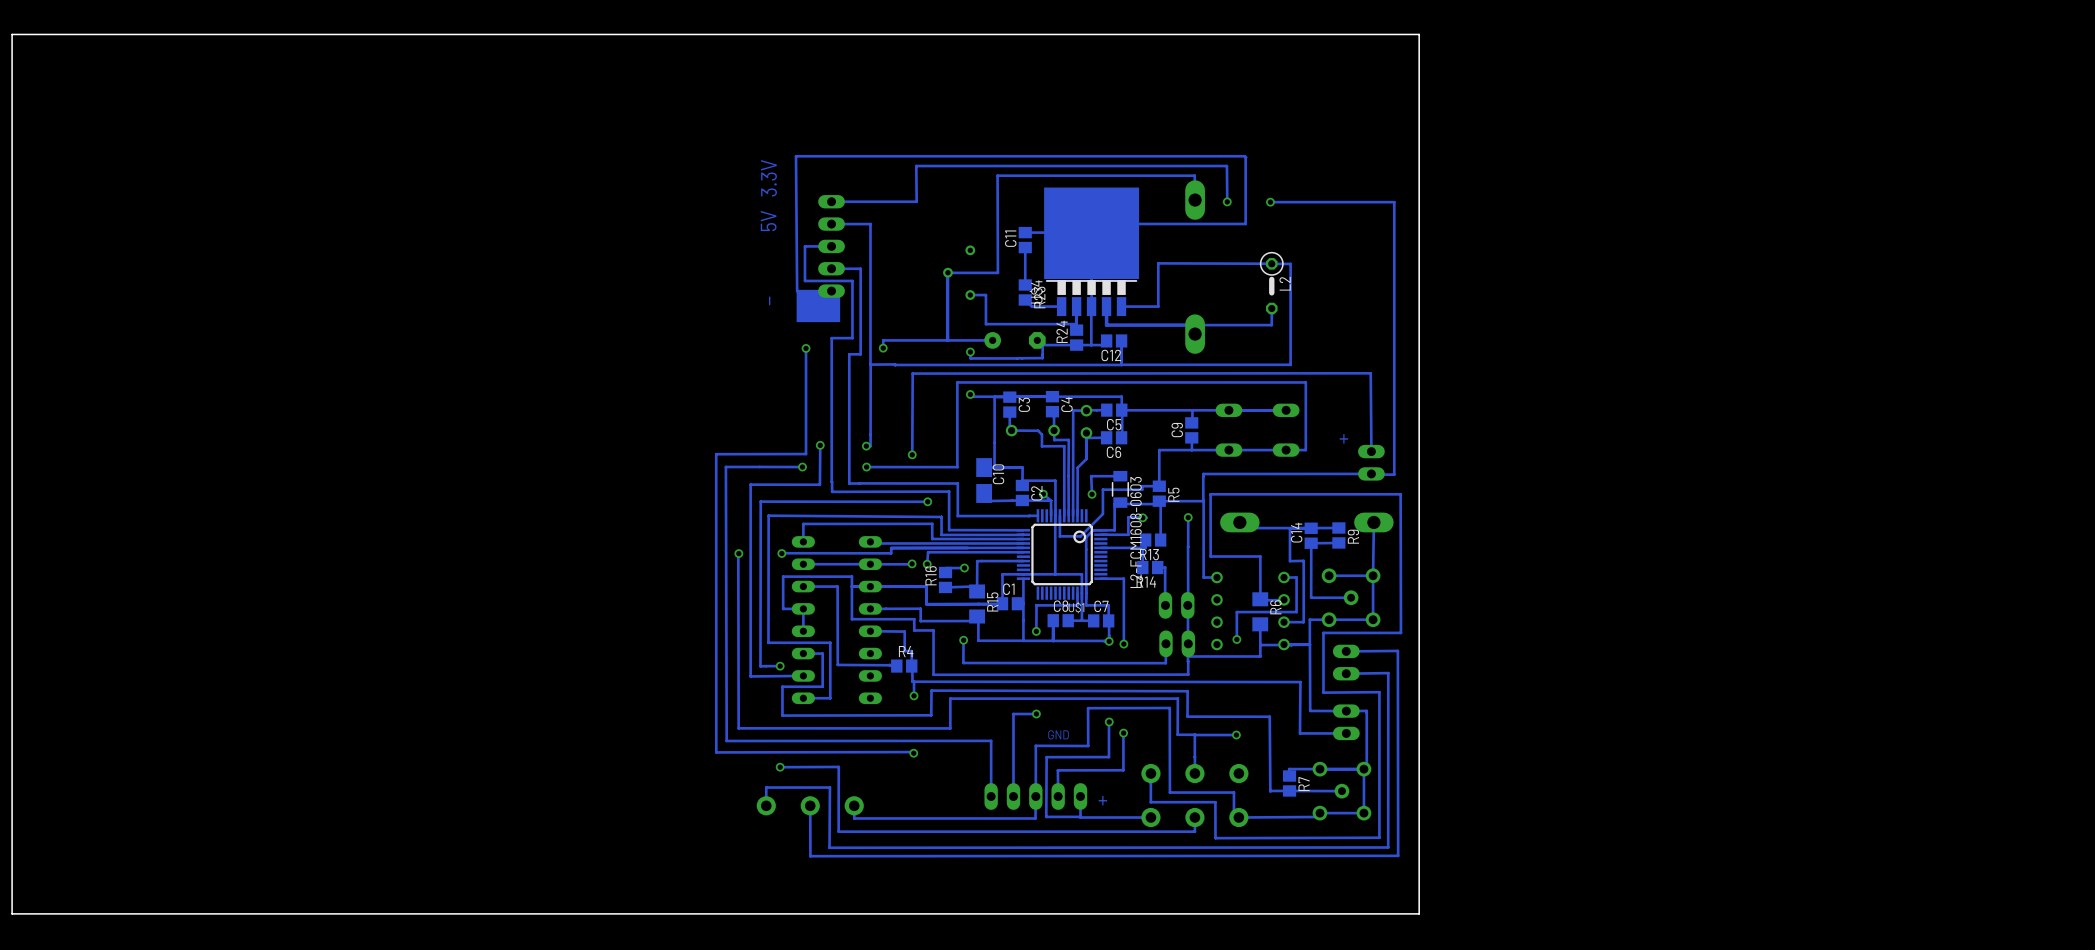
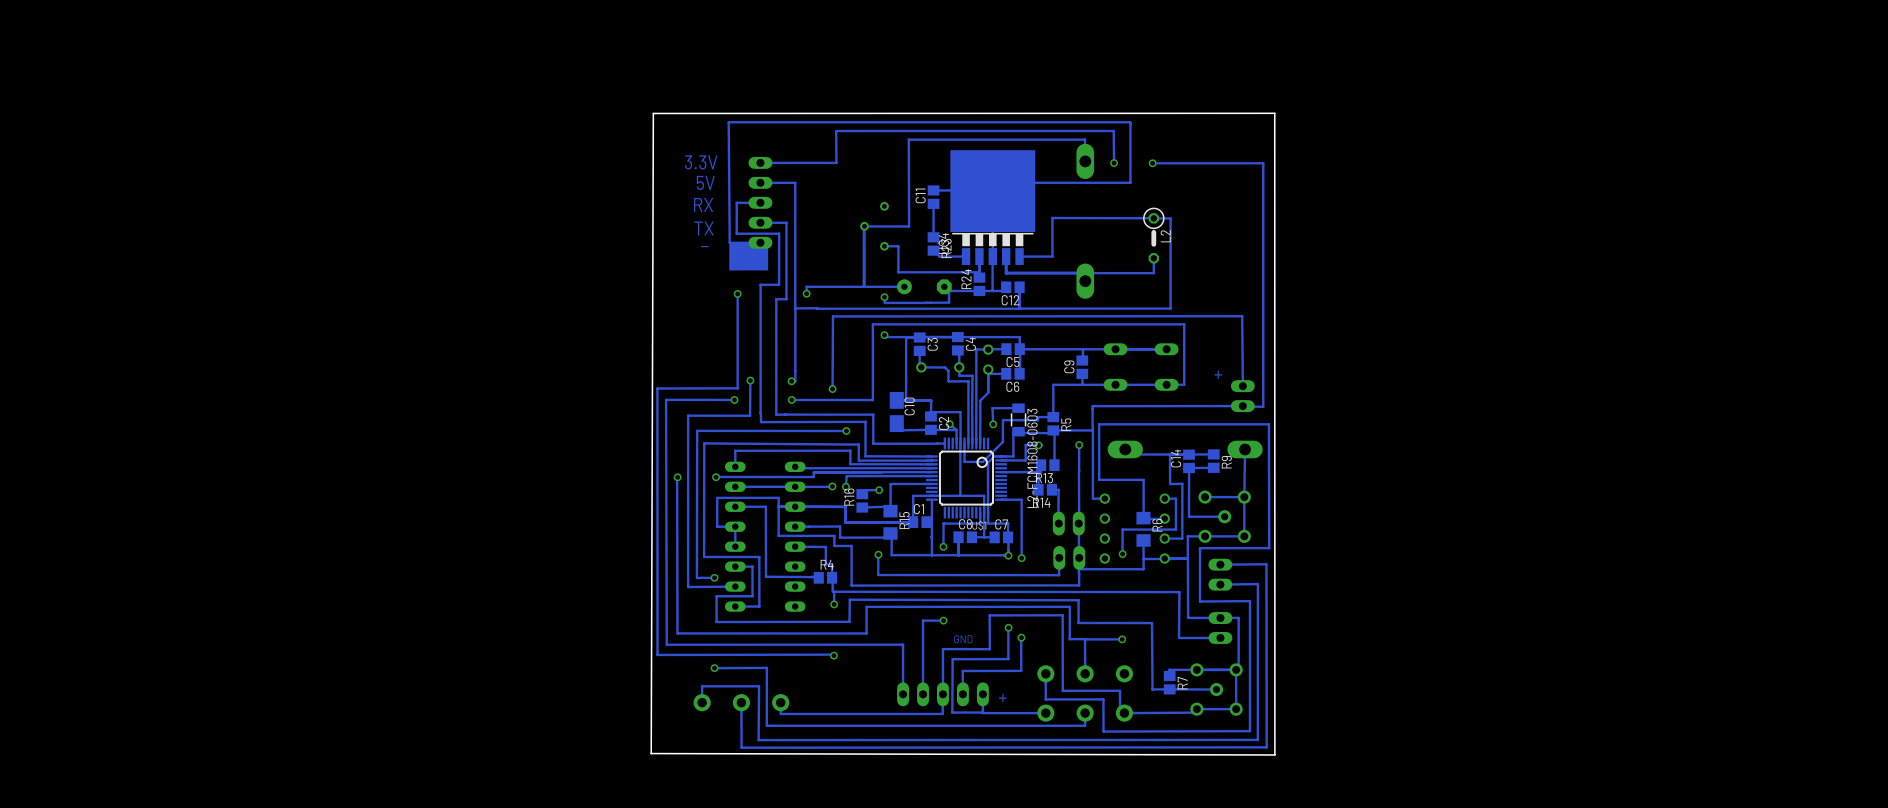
board edge: (1419, 34) (12, 34) (12, 913) (1419, 913) (1419, 34) -> none
board edge: none -> (1274, 113) (653, 113) (651, 753) (1274, 754) (1274, 113)
text rotation: 0° (769, 178) -> 90° clockwise (701, 162)
text rotation: 0° (768, 221) -> 90° clockwise (705, 182)
text: none -> RX (703, 204)
text: none -> TX (704, 228)
text rotation: 0° (769, 300) -> 90° clockwise (704, 246)

